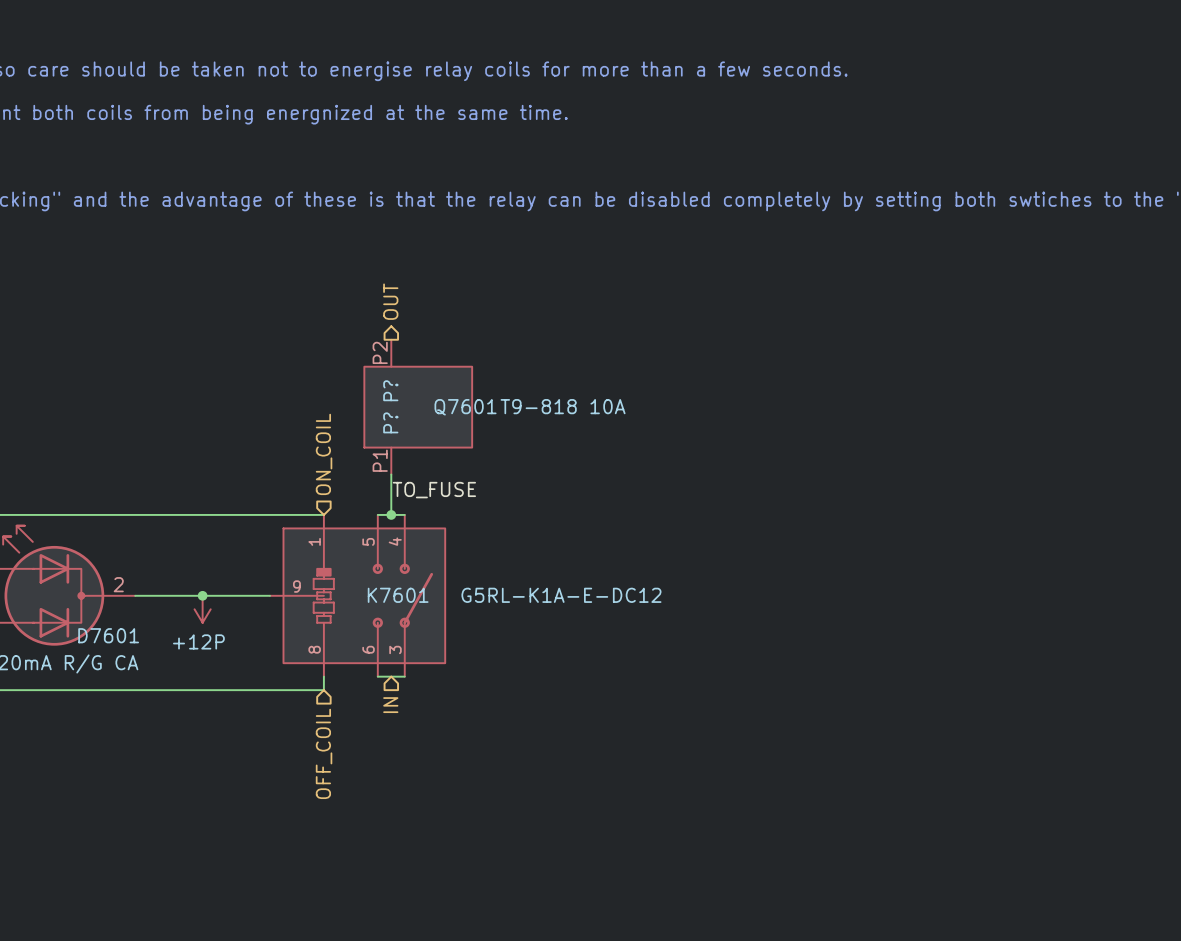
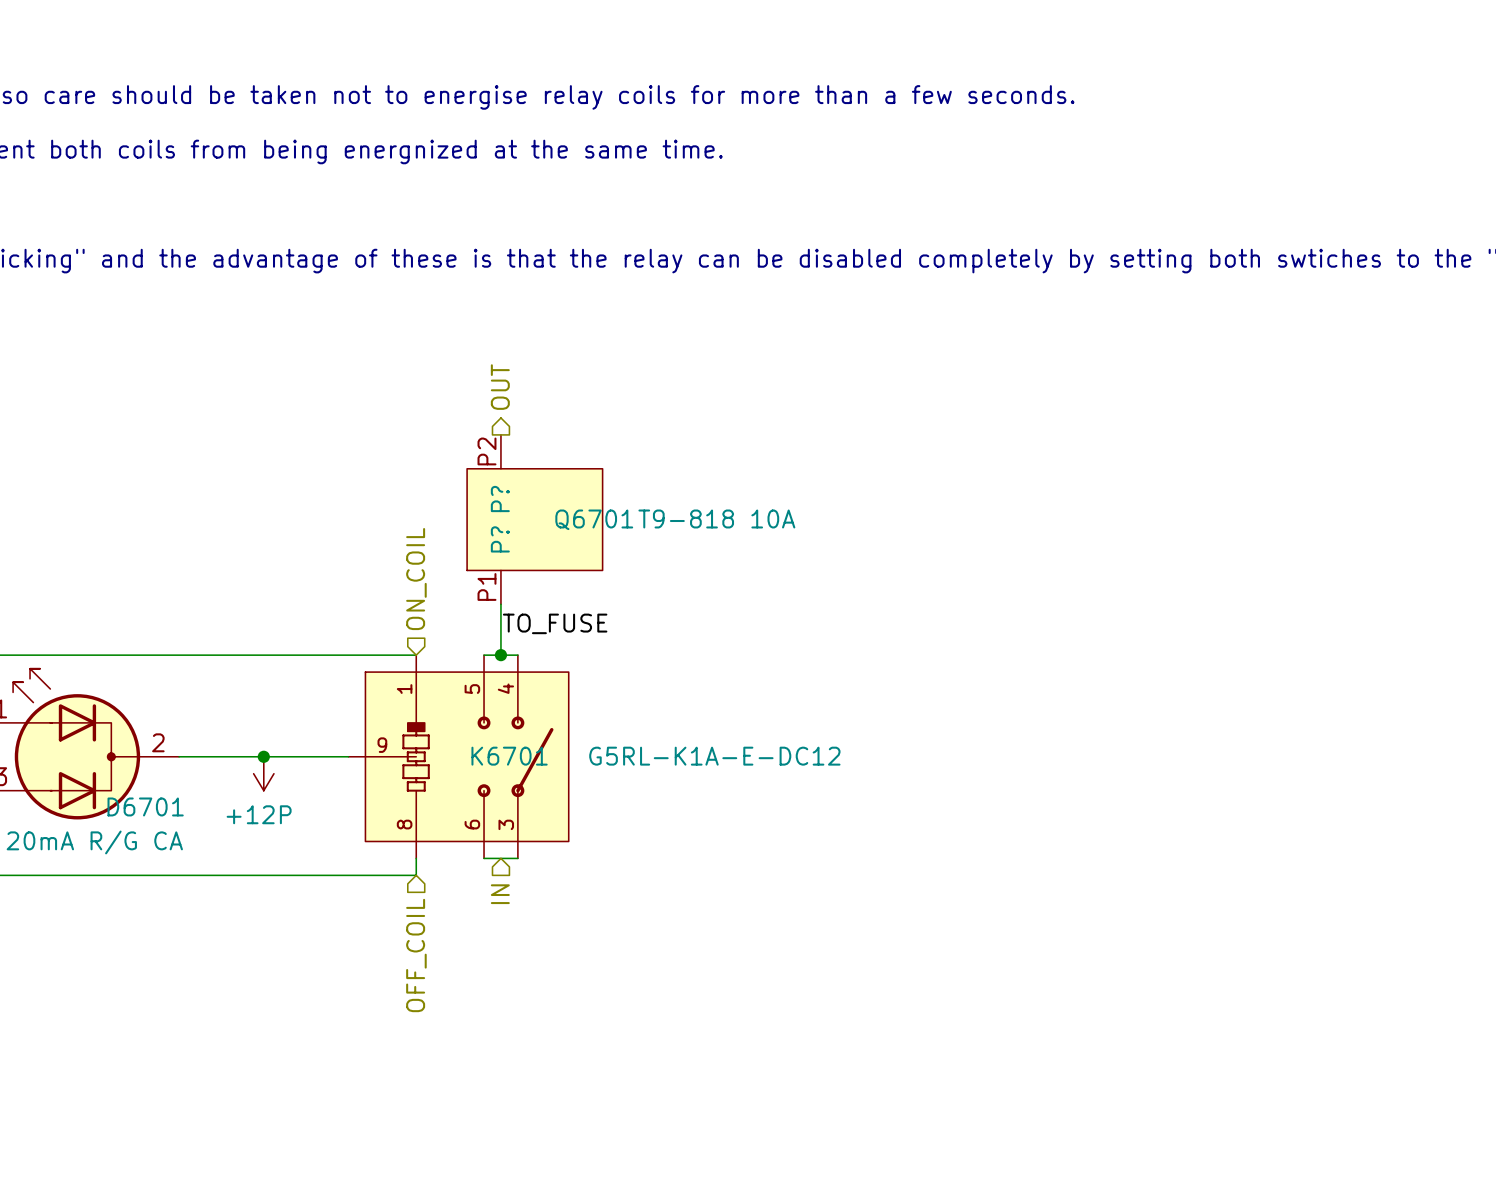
Q7601 name: Q7601 (465, 407) -> Q6701 (594, 519)
K7601 name: K7601 (398, 595) -> K6701 (509, 756)
D7601 name: D7601 (108, 635) -> D6701 (145, 806)

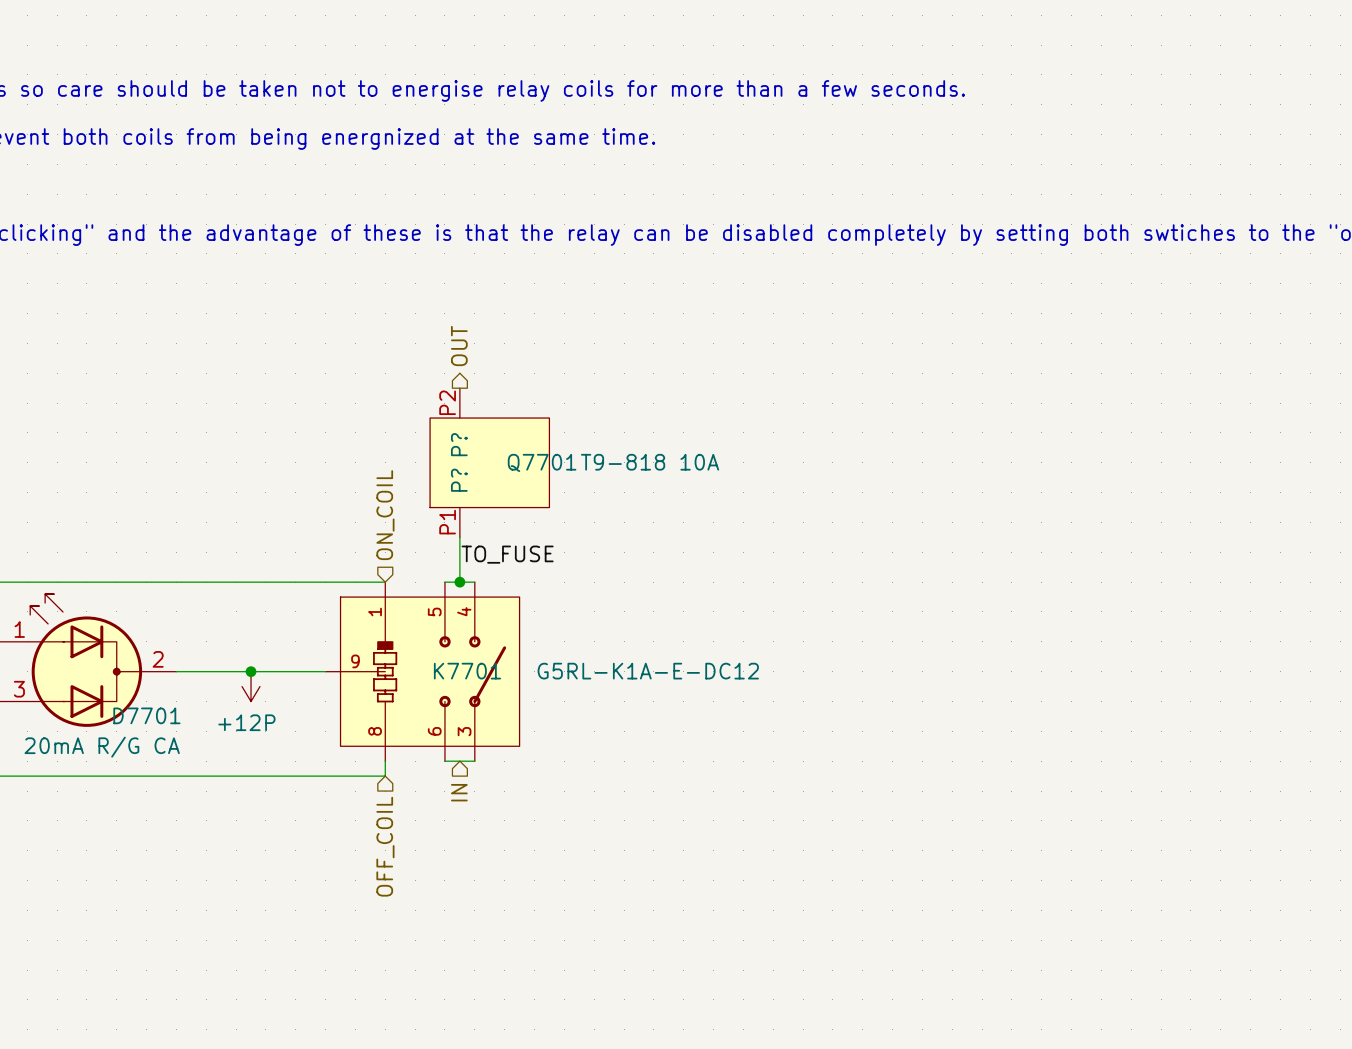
Q6701 name: Q6701 (594, 519) -> Q7701 (542, 462)
K6701 name: K6701 (509, 756) -> K7701 (467, 671)
D6701 name: D6701 (145, 806) -> D7701 (146, 715)

